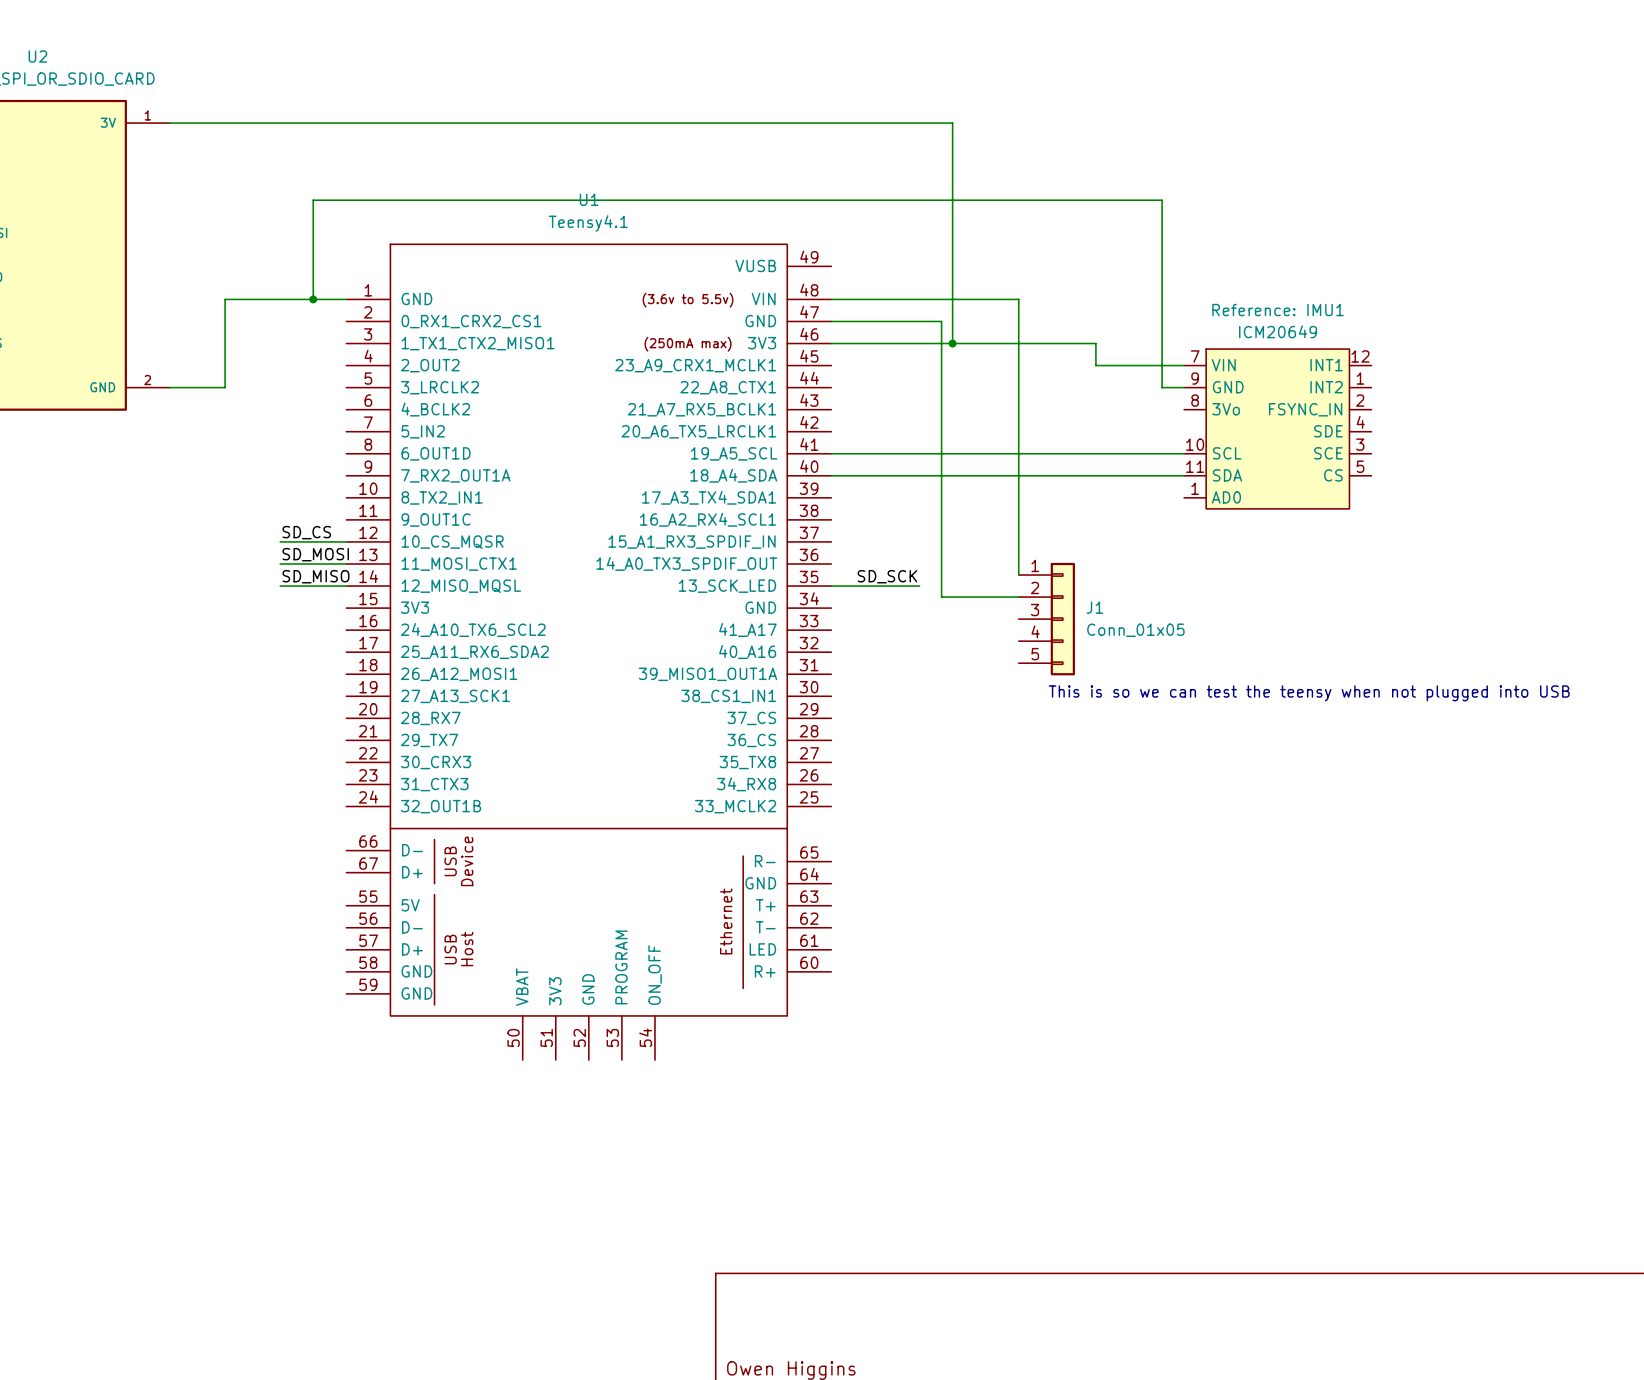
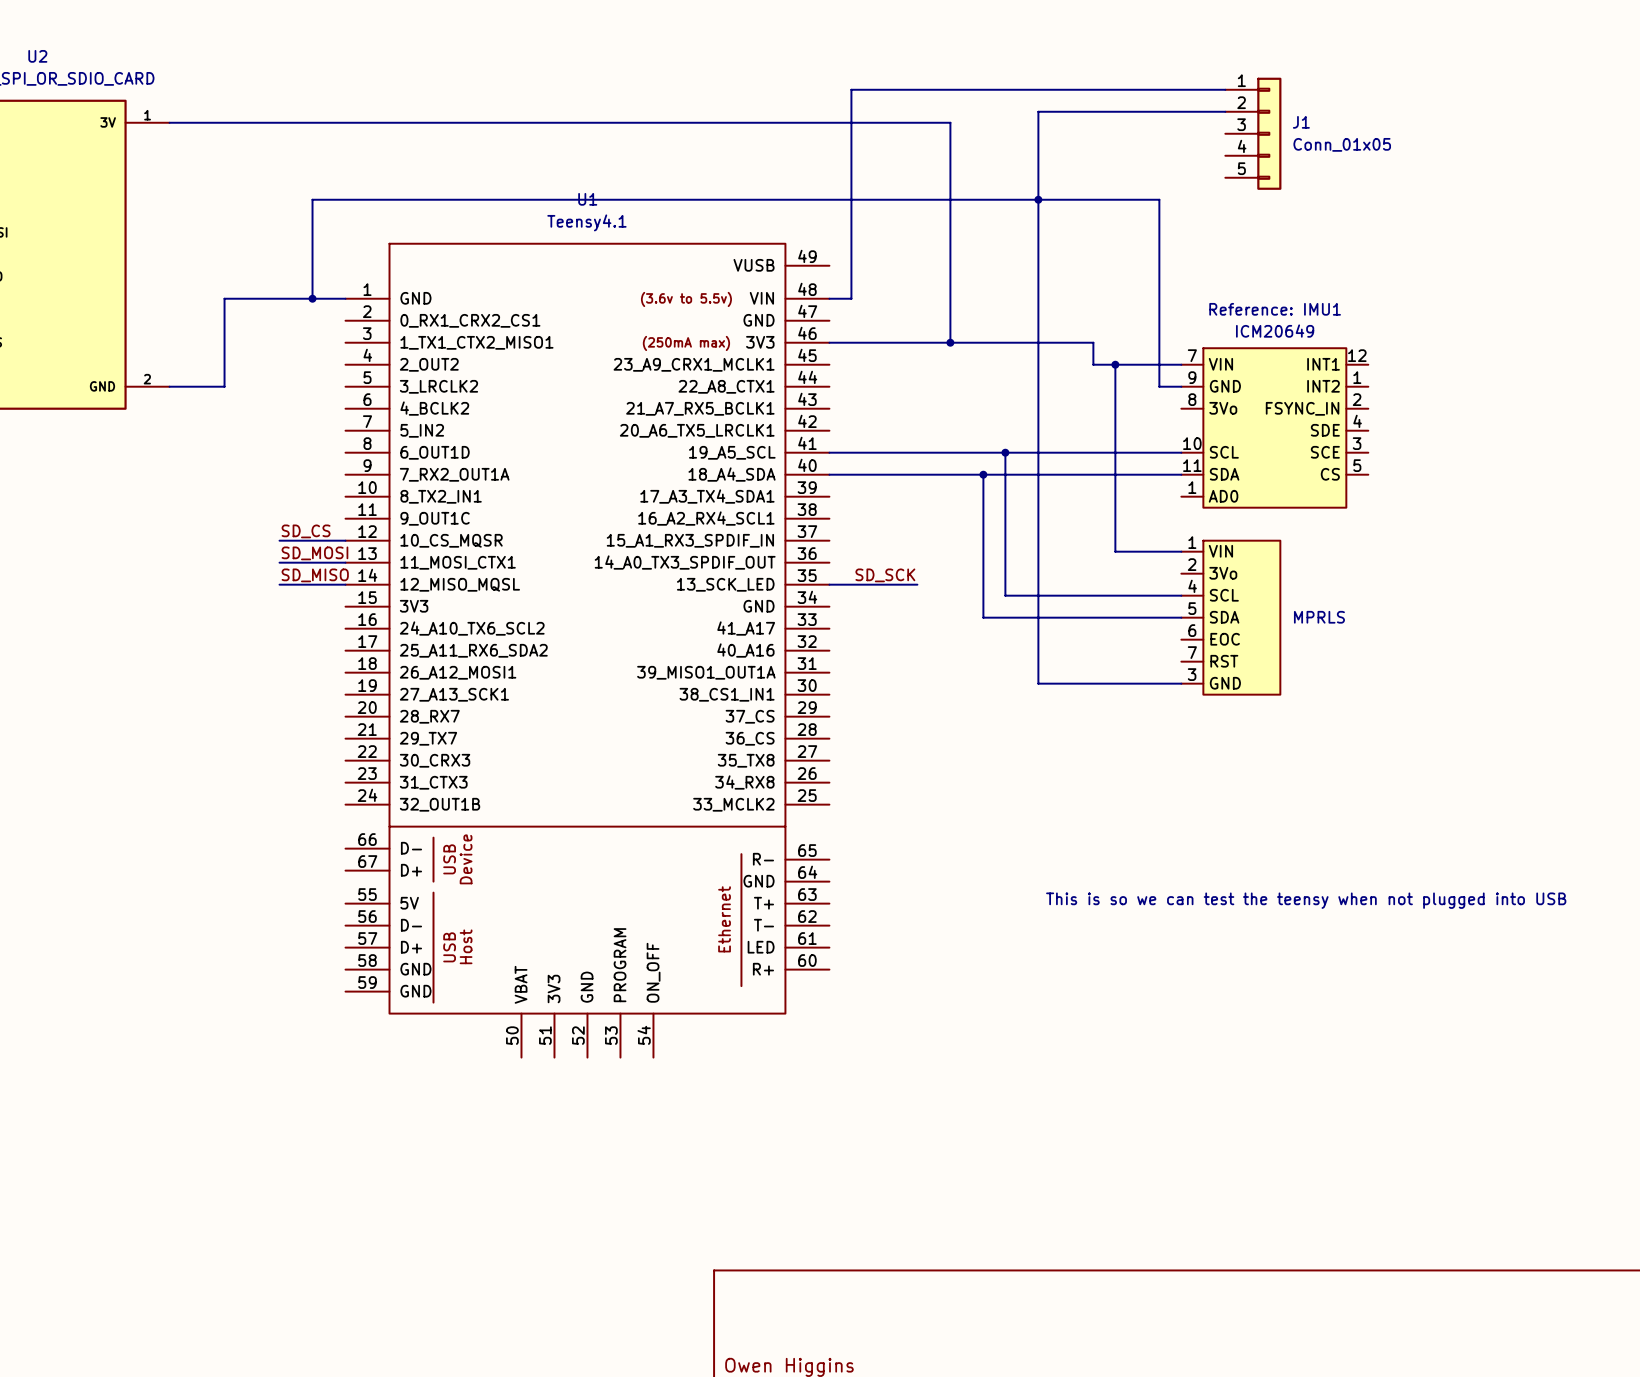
wire: none -> (1225, 111) (1038, 111) (1038, 683) (1181, 683)
junction: none -> (1038, 199)
wire: (853, 299) (1018, 299) (1018, 575) -> (851, 298) (851, 89) (1225, 89)
wire: (831, 321) (941, 321) (941, 597) (1007, 597) -> (1005, 452) (1005, 595)
wire: none -> (1115, 364) (1115, 551) (1181, 551)
junction: none -> (1115, 364)
junction: none -> (1005, 452)
wire: none -> (983, 474) (983, 617) (1181, 617)
junction: none -> (983, 474)
wire: none -> (1016, 595) (1181, 595)
J1 position: (1046, 619) -> (1253, 133)
part: none -> MPRLS (1230, 617)
text position: This is so we can test the teensy when not plugged into USB (1309, 693) -> This is so we can test the teensy when not plugged into USB (1306, 900)

